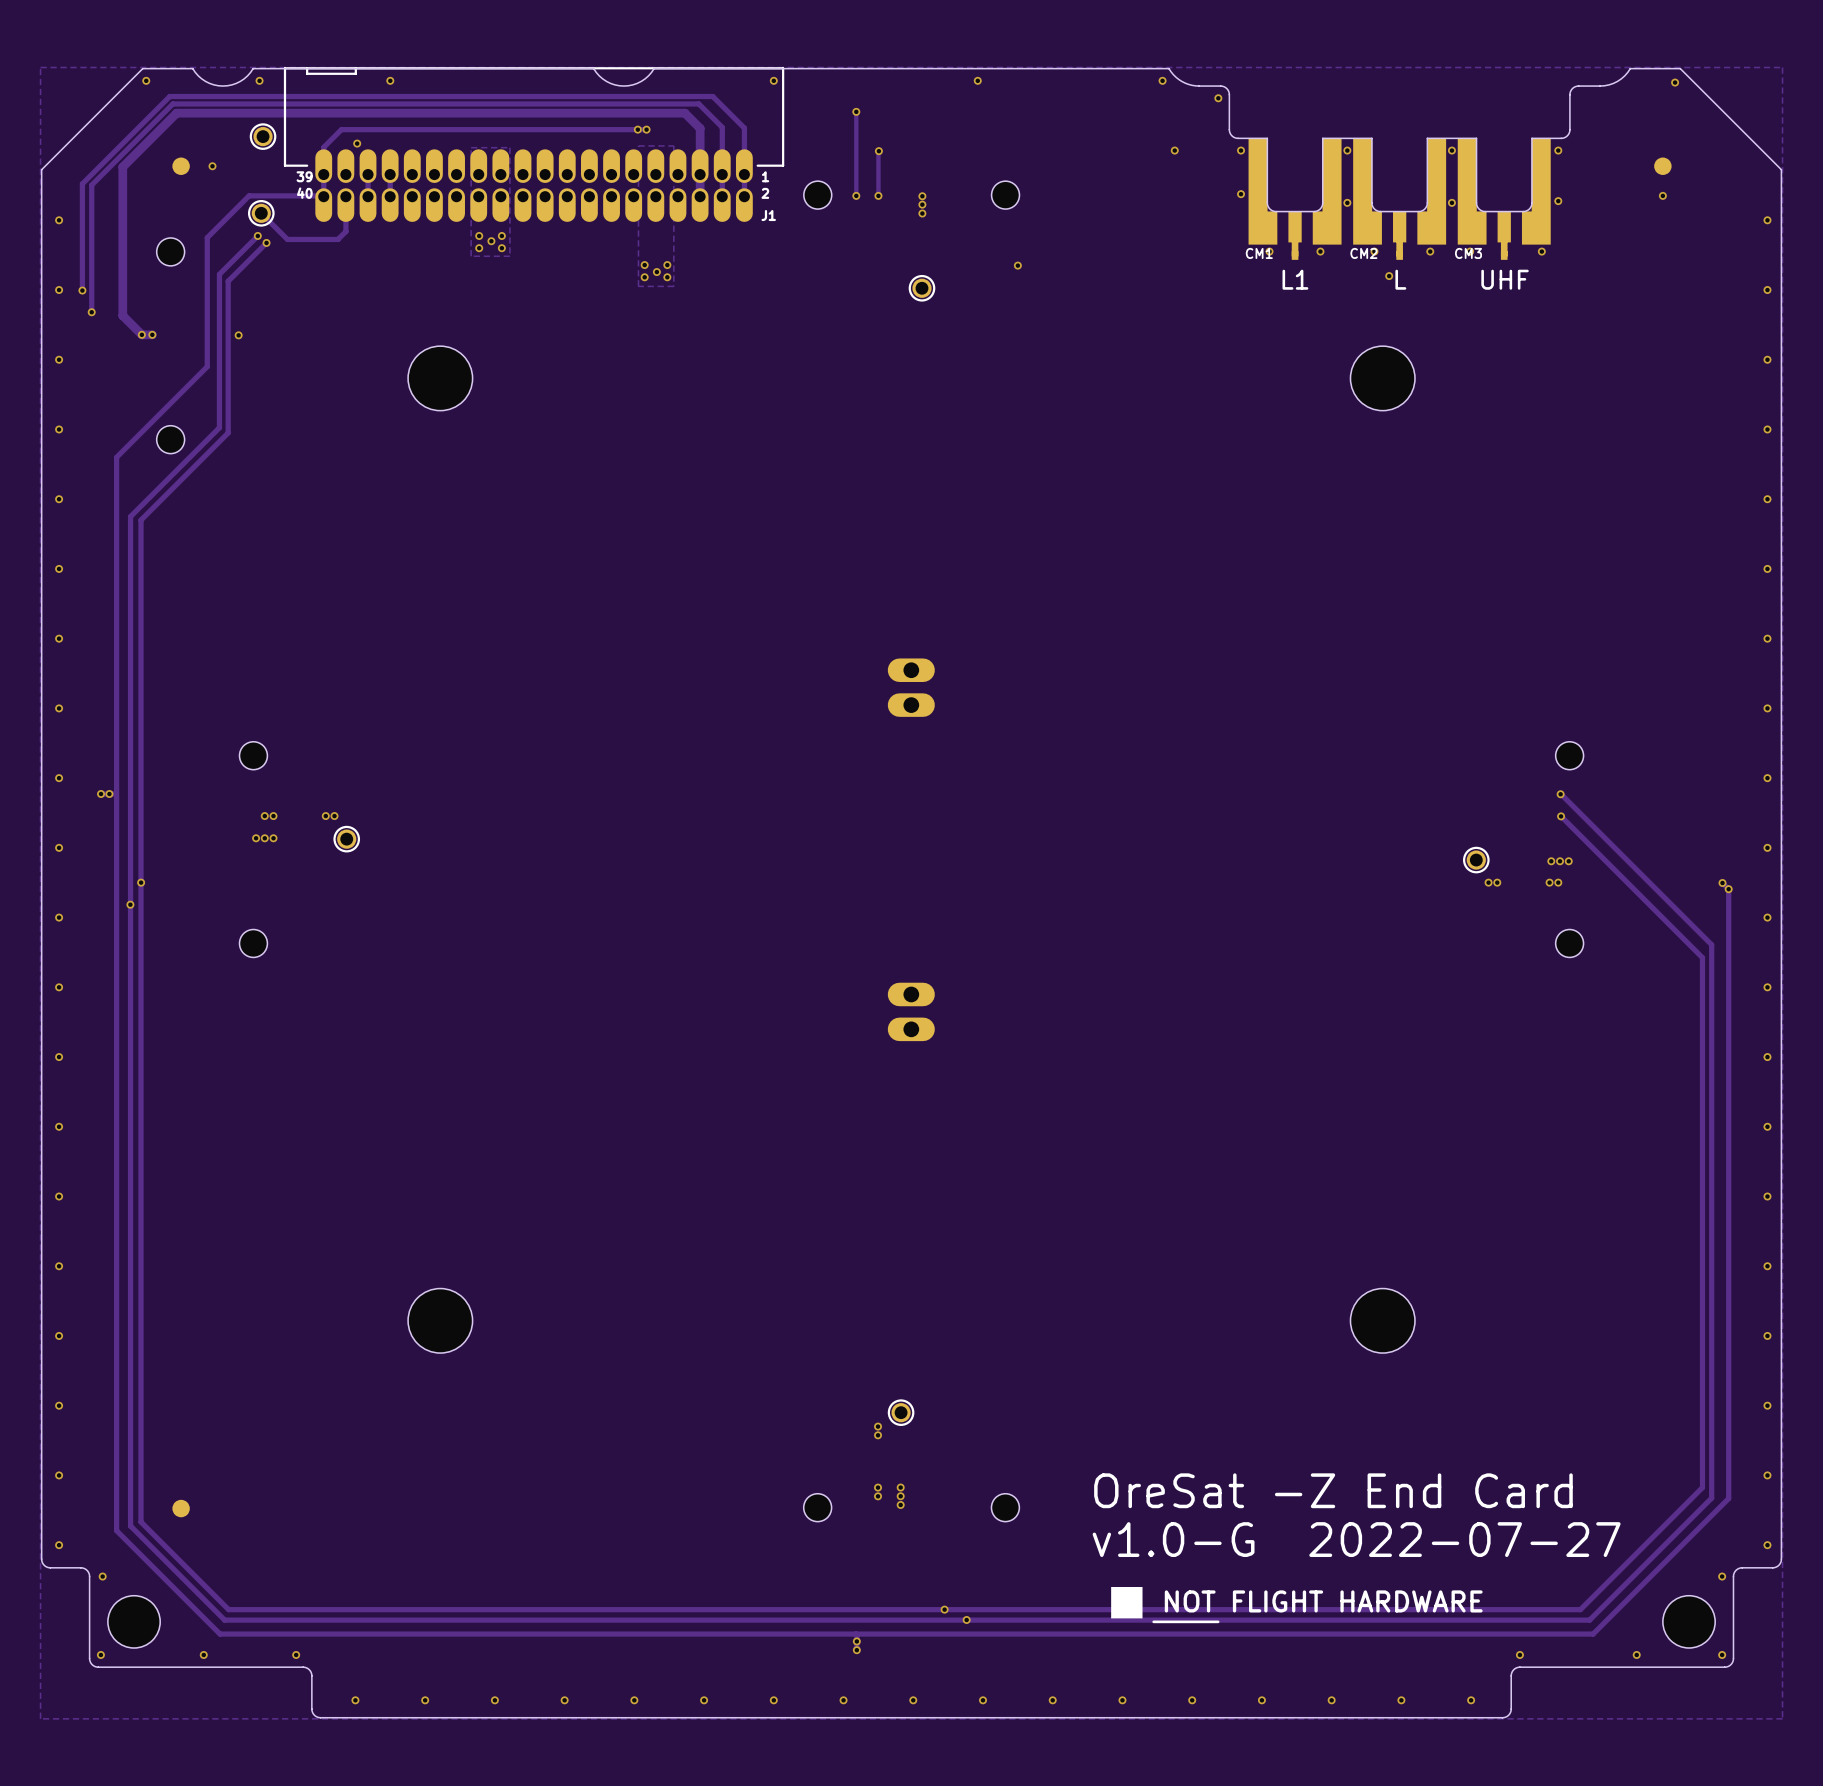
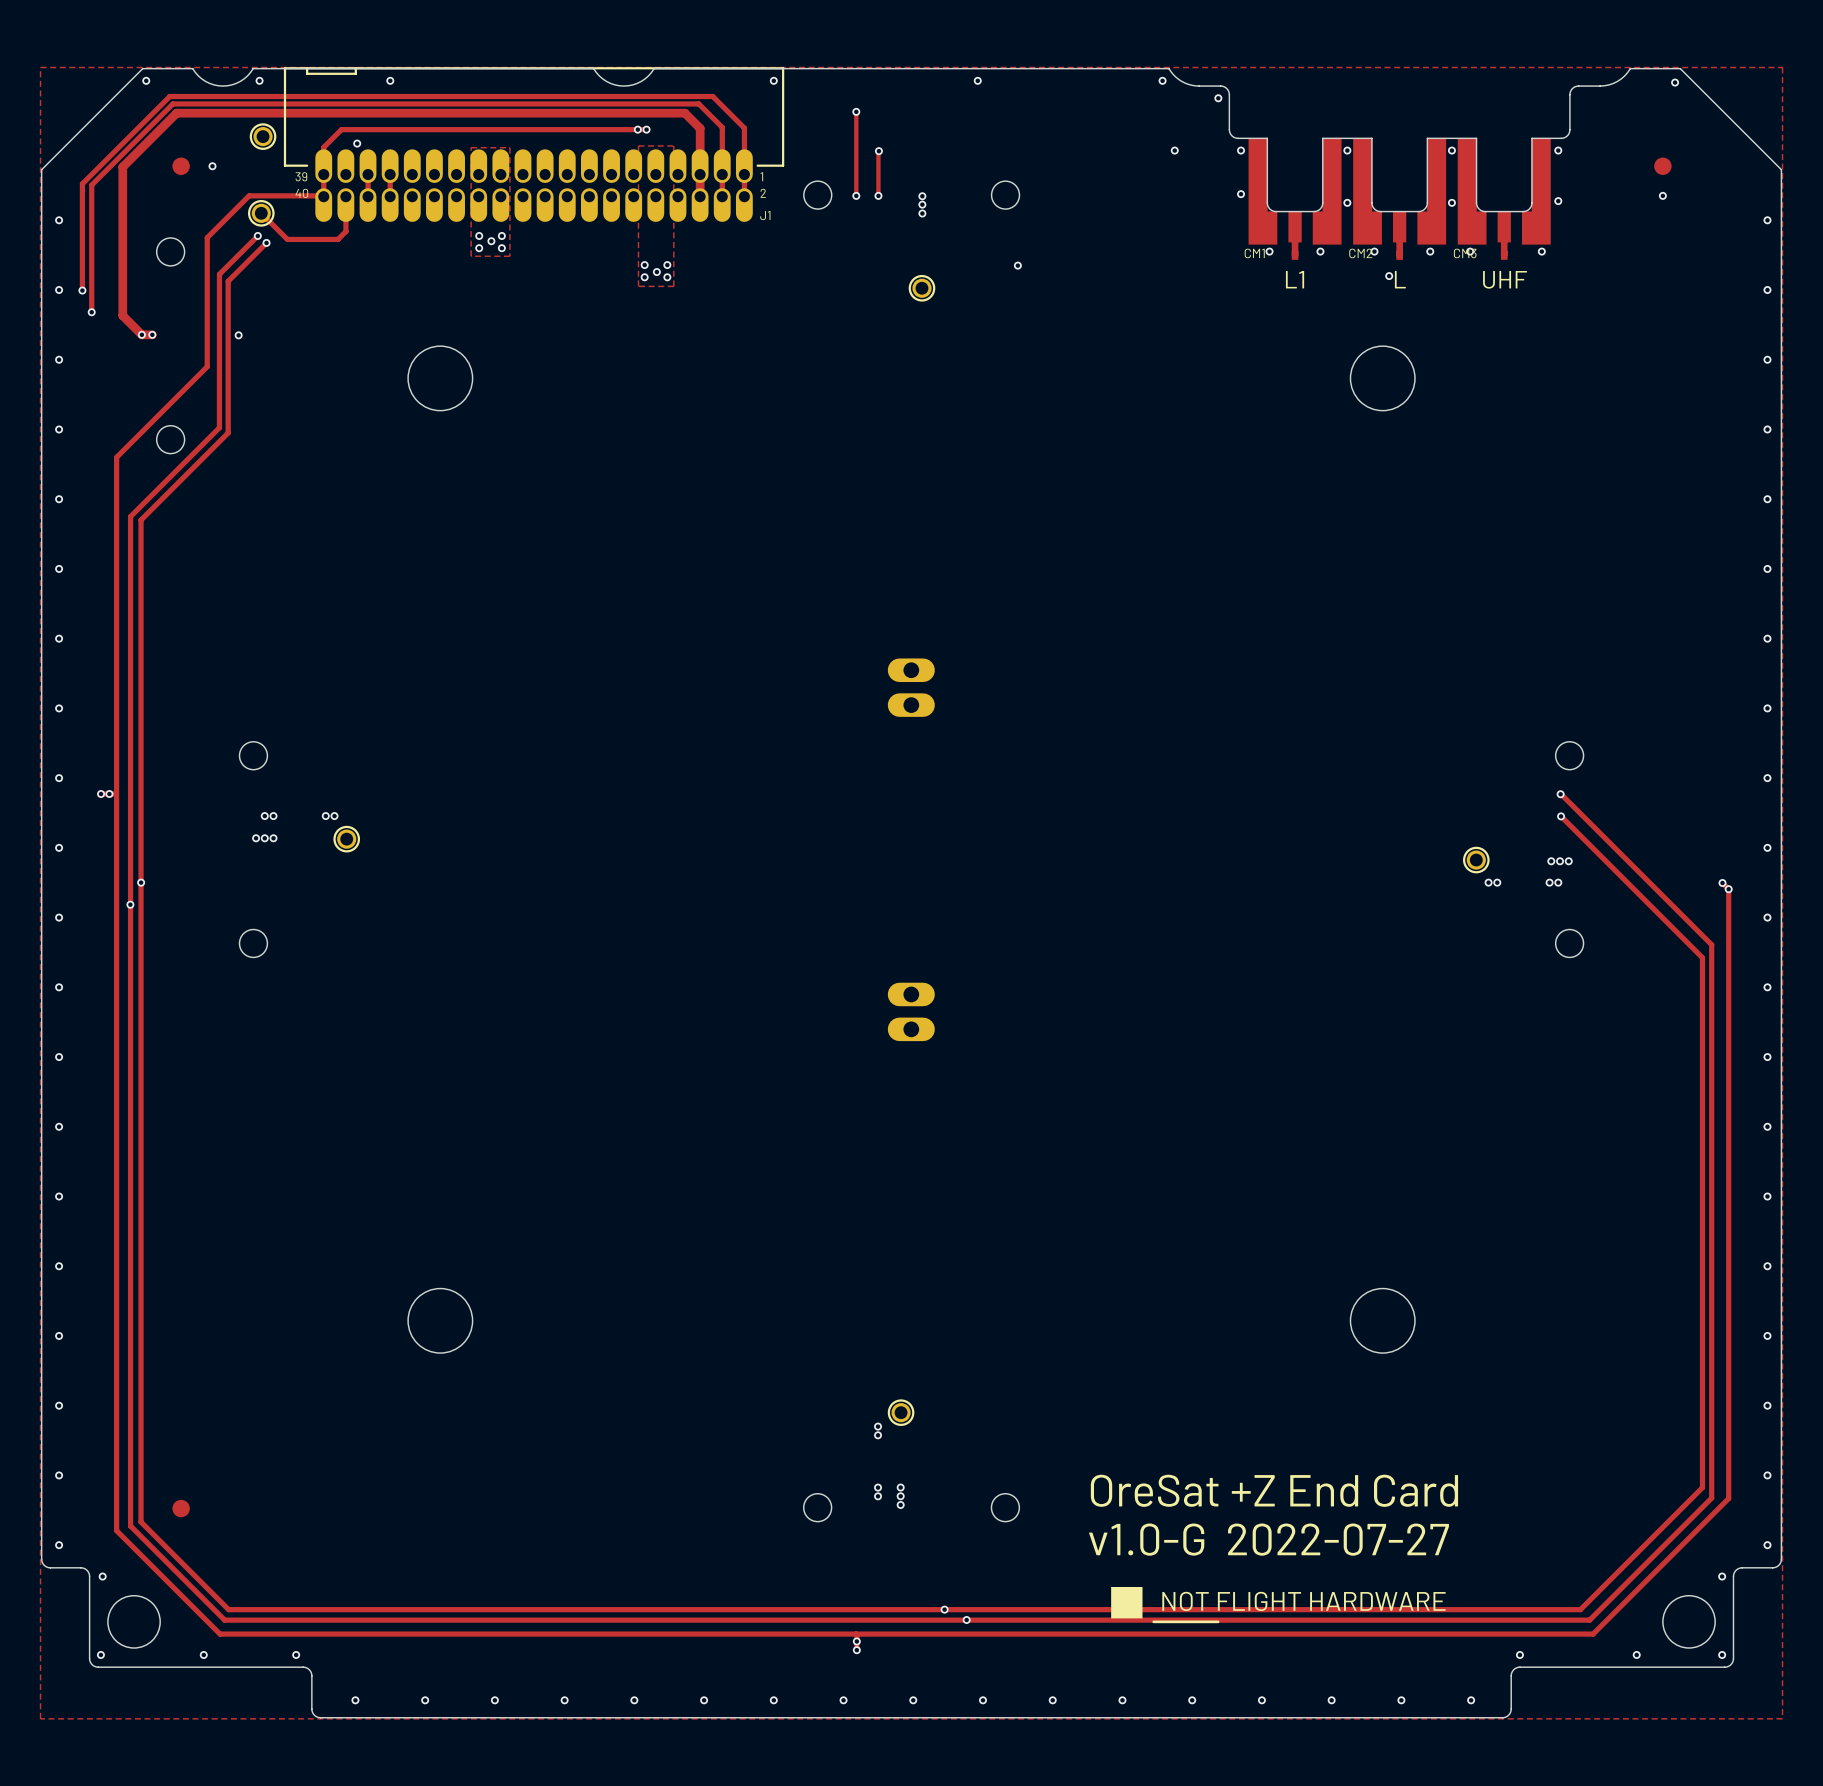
text: OreSat -Z End Card (1333, 1490) -> OreSat +Z End Card (1274, 1490)

